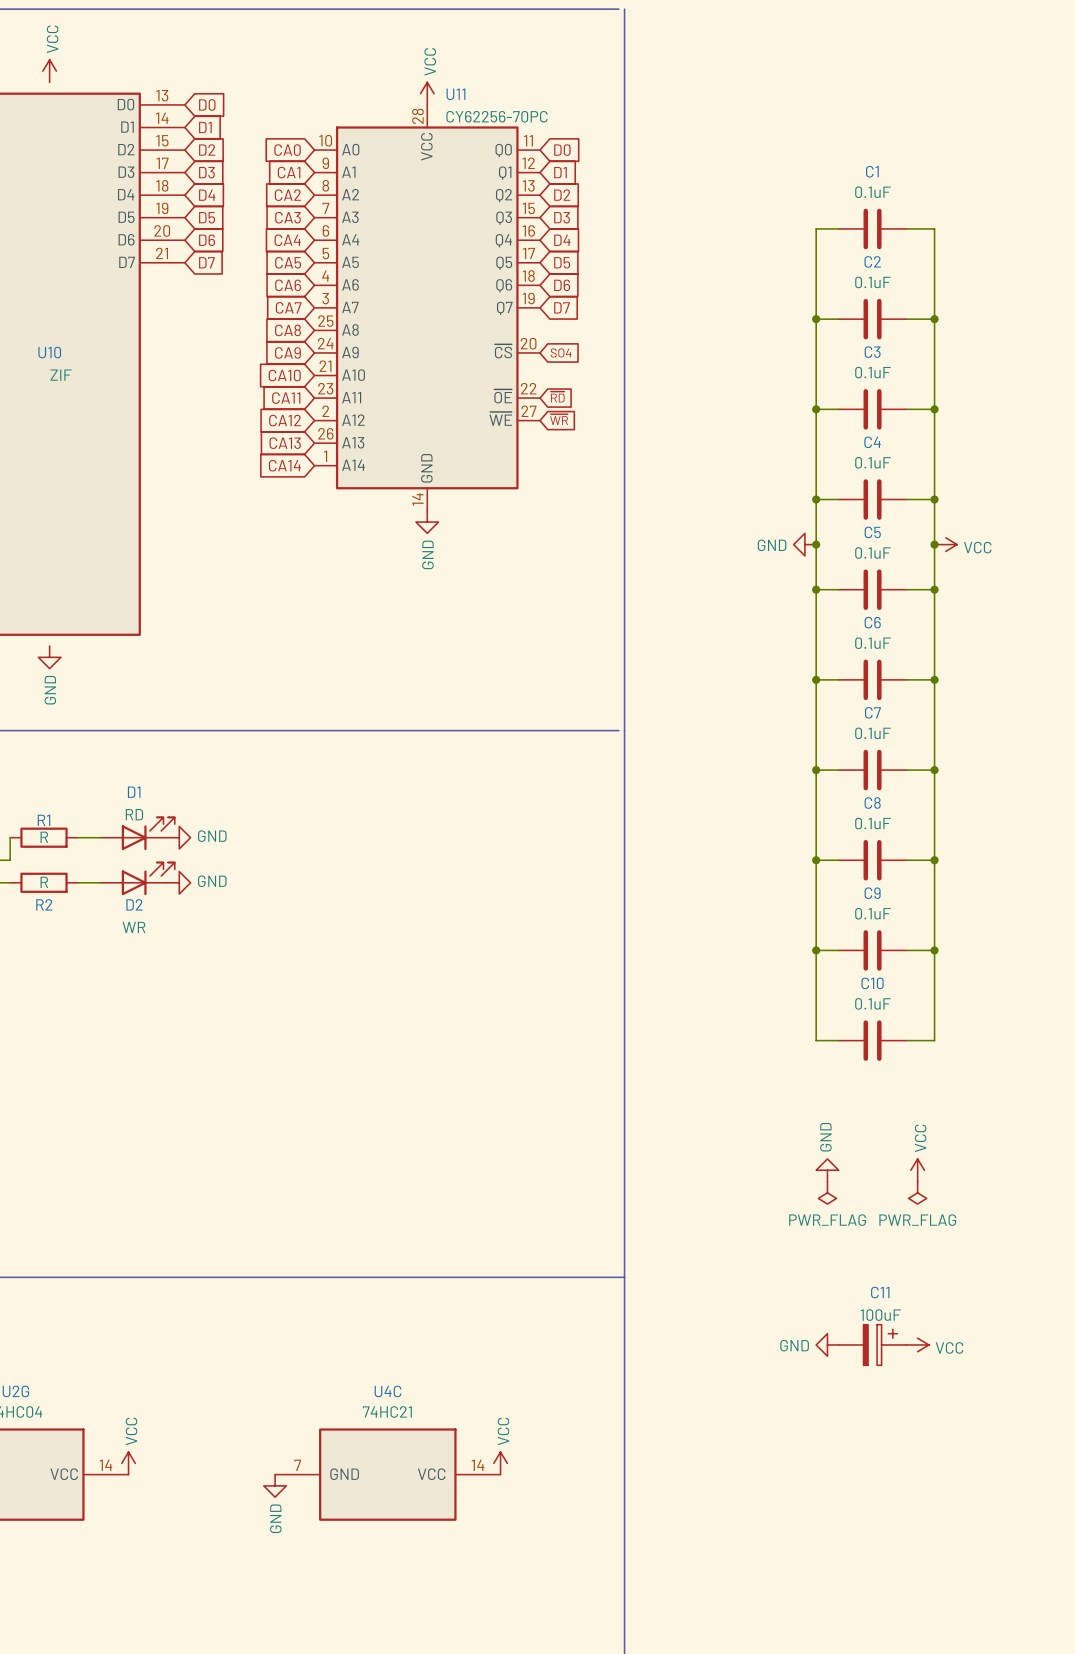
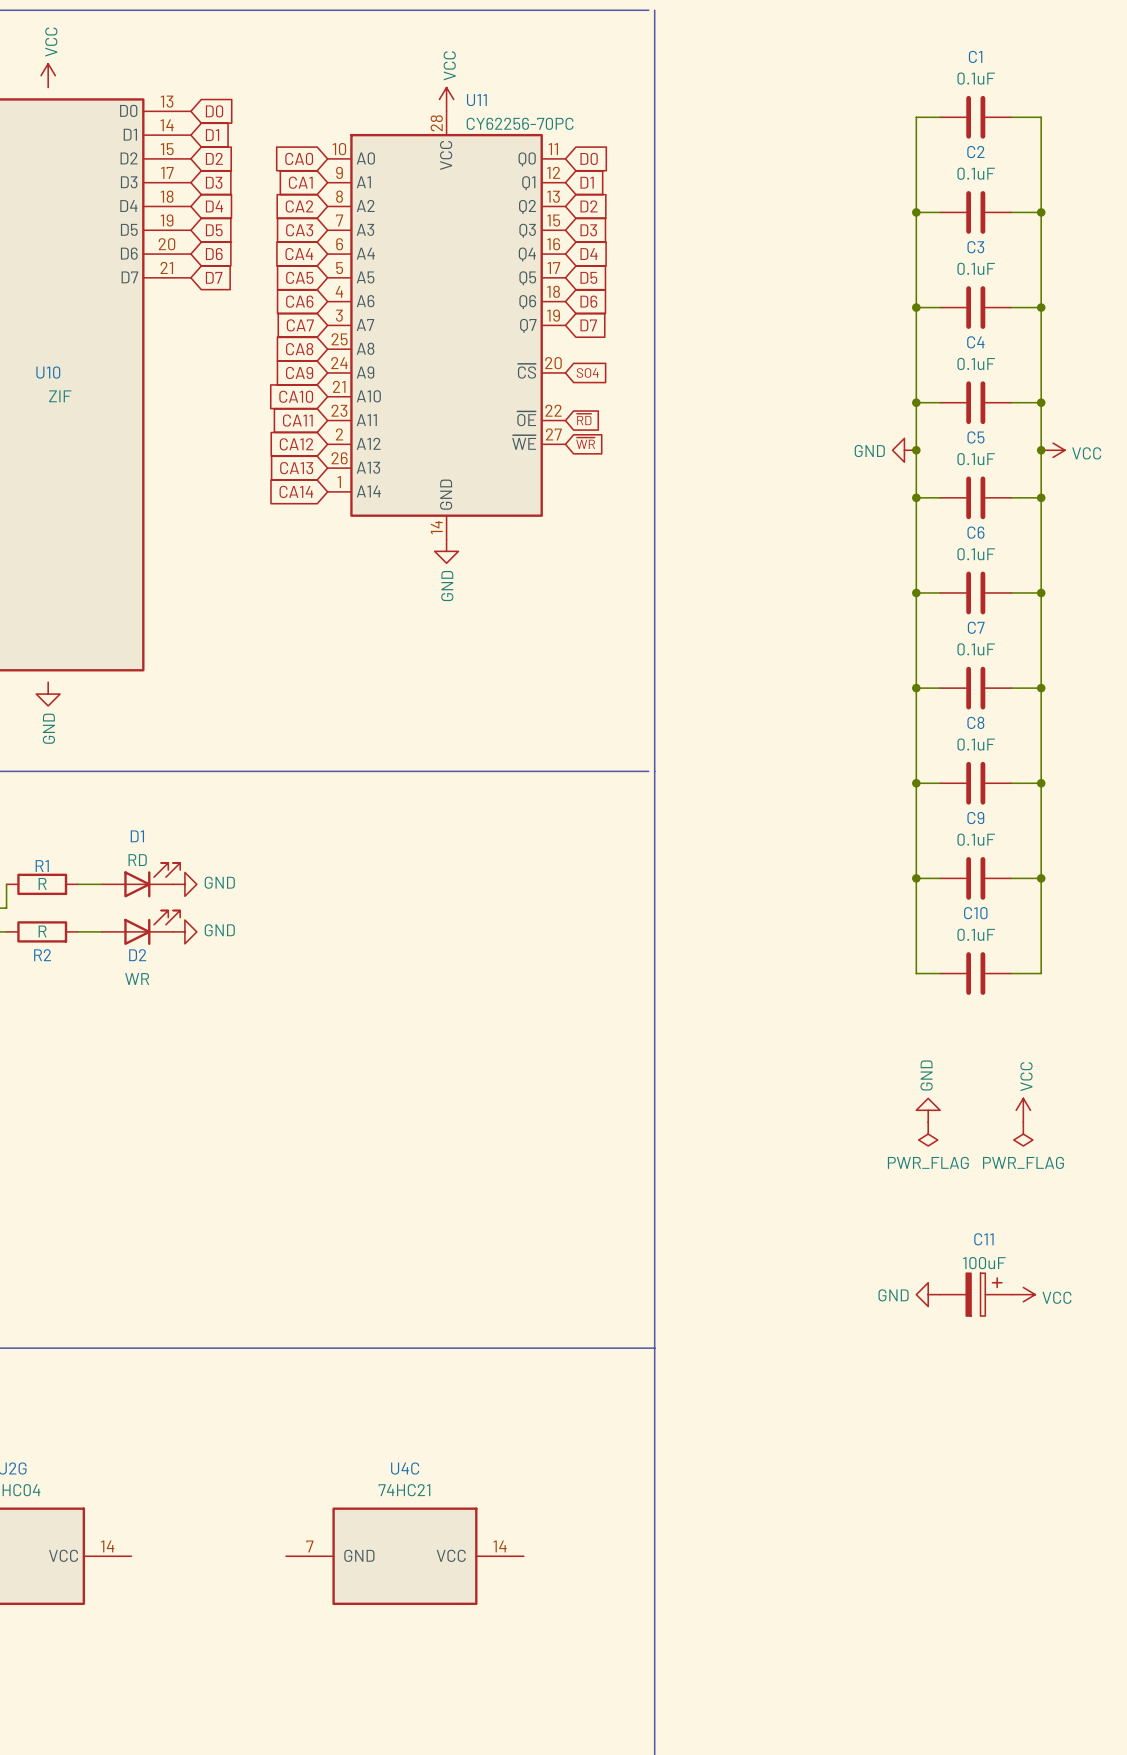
junction: none -> (916, 212)
junction: none -> (1041, 212)
wire: (838, 228) (816, 228) (816, 1040) (838, 1040) -> (940, 117) (916, 117) (916, 973) (940, 973)
C1 position: (872, 228) -> (975, 117)
wire: (906, 228) (934, 228) (934, 1040) (906, 1040) -> (1011, 117) (1041, 117) (1041, 973) (1011, 973)
junction: none -> (916, 307)
junction: none -> (1041, 307)
wire: (816, 319) (838, 319) -> (916, 212) (940, 212)
junction: (816, 319) -> none
C2 position: (872, 319) -> (975, 212)
wire: (906, 319) (934, 319) -> (1011, 212) (1041, 212)
junction: (934, 319) -> none
junction: none -> (916, 402)
junction: none -> (1041, 402)
wire: (816, 409) (838, 409) -> (916, 307) (940, 307)
junction: (816, 409) -> none
C3 position: (872, 409) -> (975, 307)
wire: (906, 409) (934, 409) -> (1011, 307) (1041, 307)
junction: (934, 409) -> none
junction: none -> (916, 450)
junction: none -> (1041, 450)
junction: none -> (916, 497)
junction: none -> (1041, 497)
wire: (816, 499) (838, 499) -> (916, 402) (940, 402)
junction: (816, 499) -> none
C4 position: (872, 499) -> (975, 402)
wire: (906, 499) (934, 499) -> (1011, 402) (1041, 402)
junction: (934, 499) -> none
power symbol position: GND (804, 544) -> GND (904, 450)
junction: (816, 544) -> none
junction: (934, 544) -> none
power symbol position: VCC (945, 544) -> VCC (1053, 450)
junction: none -> (916, 592)
junction: none -> (1041, 592)
wire: (816, 589) (838, 589) -> (916, 497) (940, 497)
junction: (816, 589) -> none
C5 position: (872, 589) -> (975, 497)
wire: (906, 589) (934, 589) -> (1011, 497) (1041, 497)
junction: (934, 589) -> none
junction: none -> (916, 688)
junction: none -> (1041, 688)
wire: (816, 679) (838, 679) -> (916, 592) (940, 592)
junction: (816, 679) -> none
C6 position: (872, 679) -> (975, 592)
wire: (906, 679) (934, 679) -> (1011, 592) (1041, 592)
junction: (934, 679) -> none
junction: none -> (916, 783)
junction: none -> (1041, 783)
wire: (816, 770) (838, 770) -> (916, 688) (940, 688)
junction: (816, 770) -> none
C7 position: (872, 770) -> (975, 688)
wire: (906, 770) (934, 770) -> (1011, 688) (1041, 688)
junction: (934, 770) -> none
junction: none -> (916, 878)
junction: none -> (1041, 878)
wire: (816, 860) (838, 860) -> (916, 783) (940, 783)
junction: (816, 860) -> none
C8 position: (872, 860) -> (975, 783)
wire: (906, 860) (934, 860) -> (1011, 783) (1041, 783)
junction: (934, 860) -> none
wire: (816, 950) (838, 950) -> (916, 878) (940, 878)
junction: (816, 950) -> none
C9 position: (872, 950) -> (975, 878)
wire: (906, 950) (934, 950) -> (1011, 878) (1041, 878)
junction: (934, 950) -> none
C10 position: (872, 1040) -> (975, 973)
power symbol: none -> GND (928, 1110)
power symbol: none -> VCC (1023, 1110)
power symbol: none -> PWR_FLAG (928, 1134)
power symbol: none -> PWR_FLAG (1023, 1134)
power symbol: GND (827, 1170) -> none
power symbol: VCC (917, 1170) -> none
power symbol: PWR_FLAG (827, 1192) -> none
power symbol: PWR_FLAG (917, 1192) -> none
power symbol: none -> GND (928, 1294)
power symbol: none -> VCC (1023, 1294)
power symbol: GND (827, 1344) -> none
C11 position: (872, 1344) -> (975, 1294)
power symbol: VCC (917, 1344) -> none
power symbol: VCC (128, 1463) -> none
power symbol: VCC (500, 1463) -> none
power symbol: GND (275, 1485) -> none

